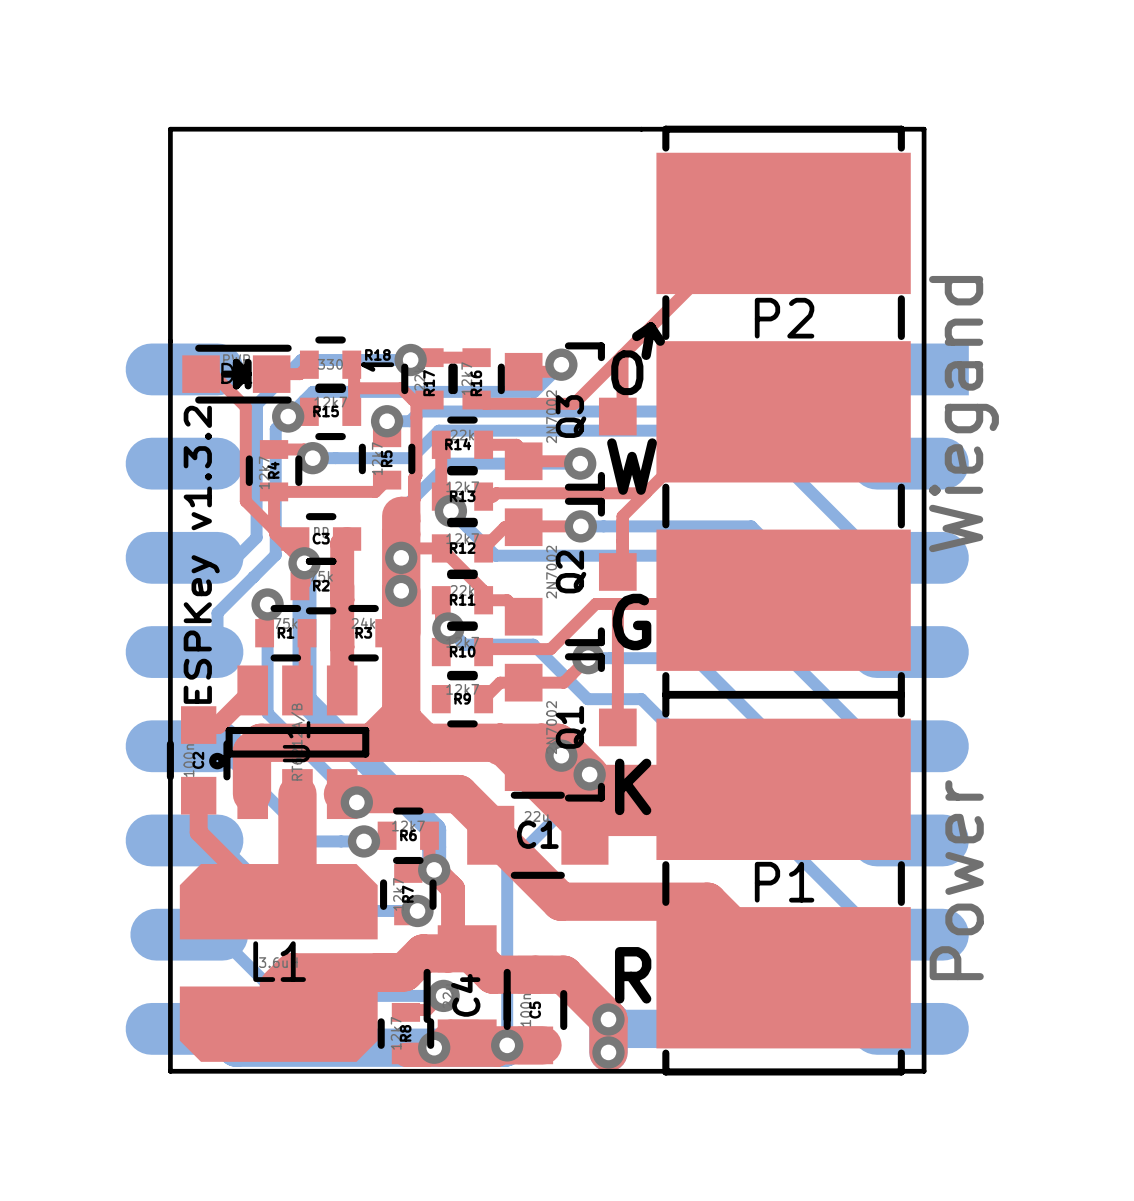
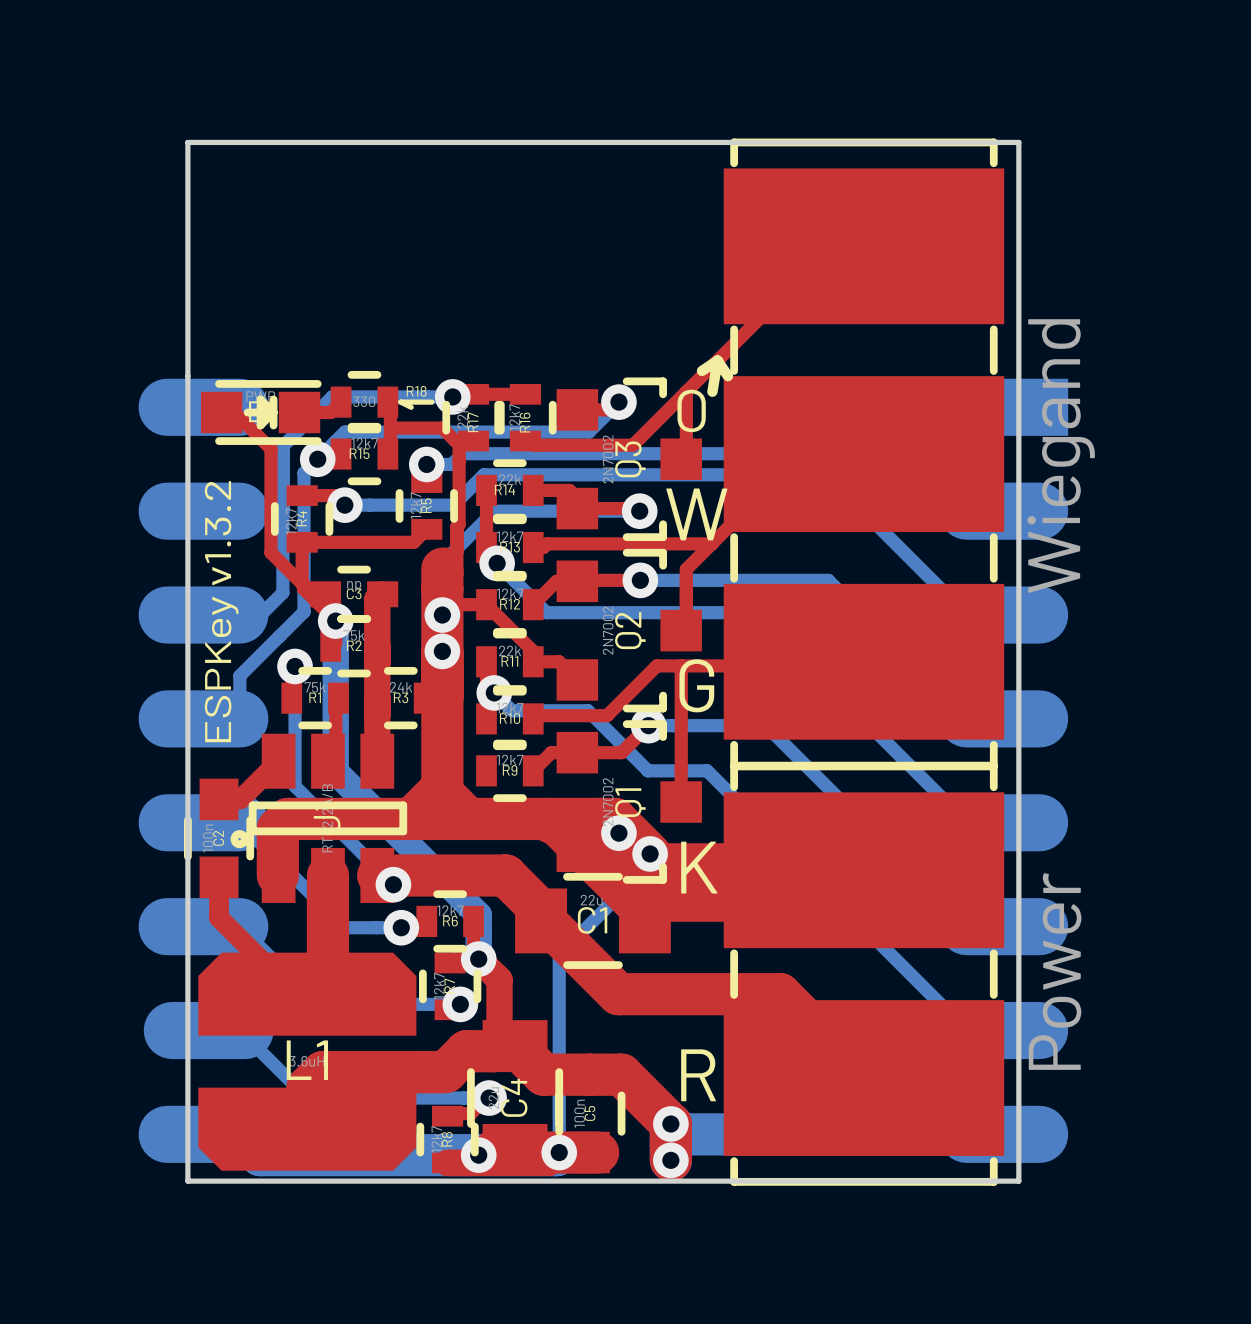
P2 name: P2 (784, 318) -> none
P1 name: P1 (784, 882) -> none

